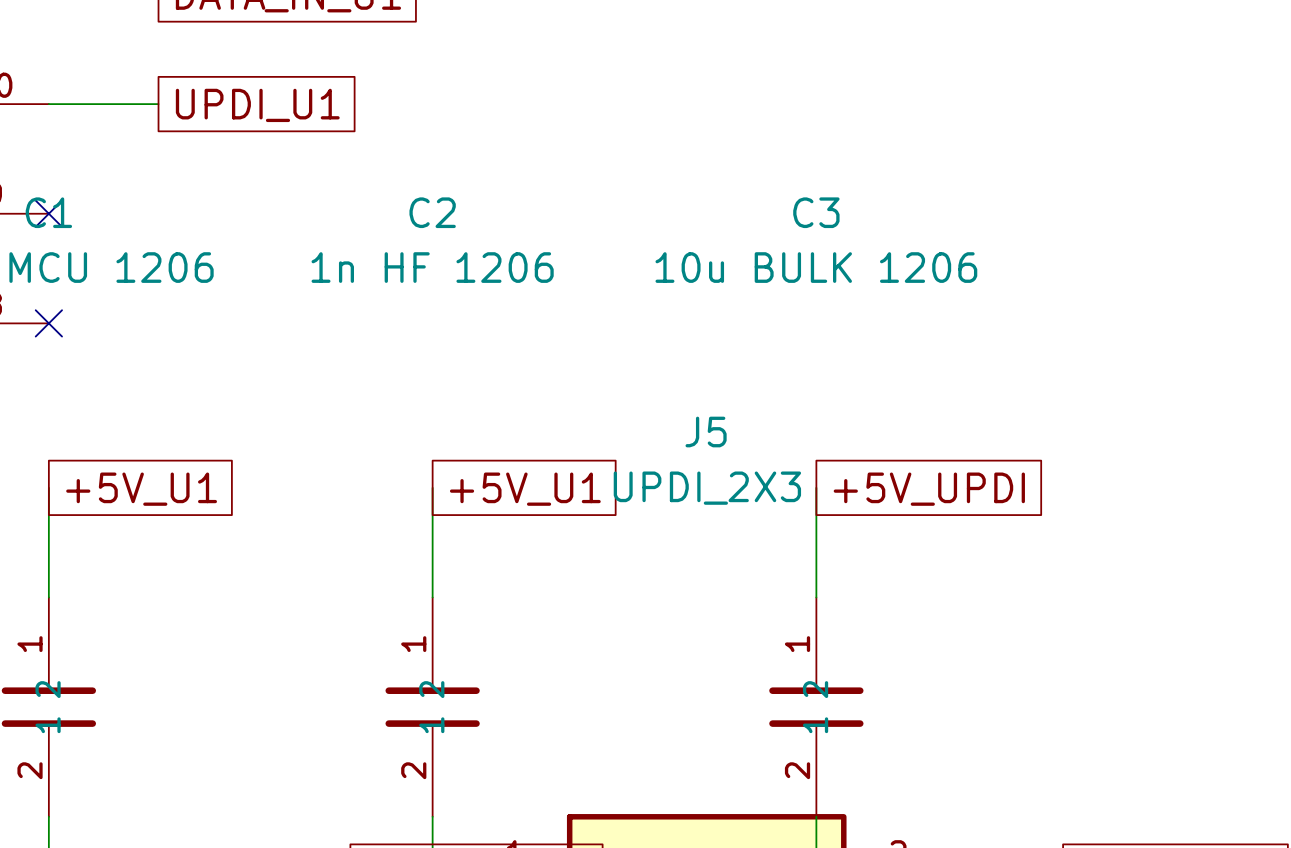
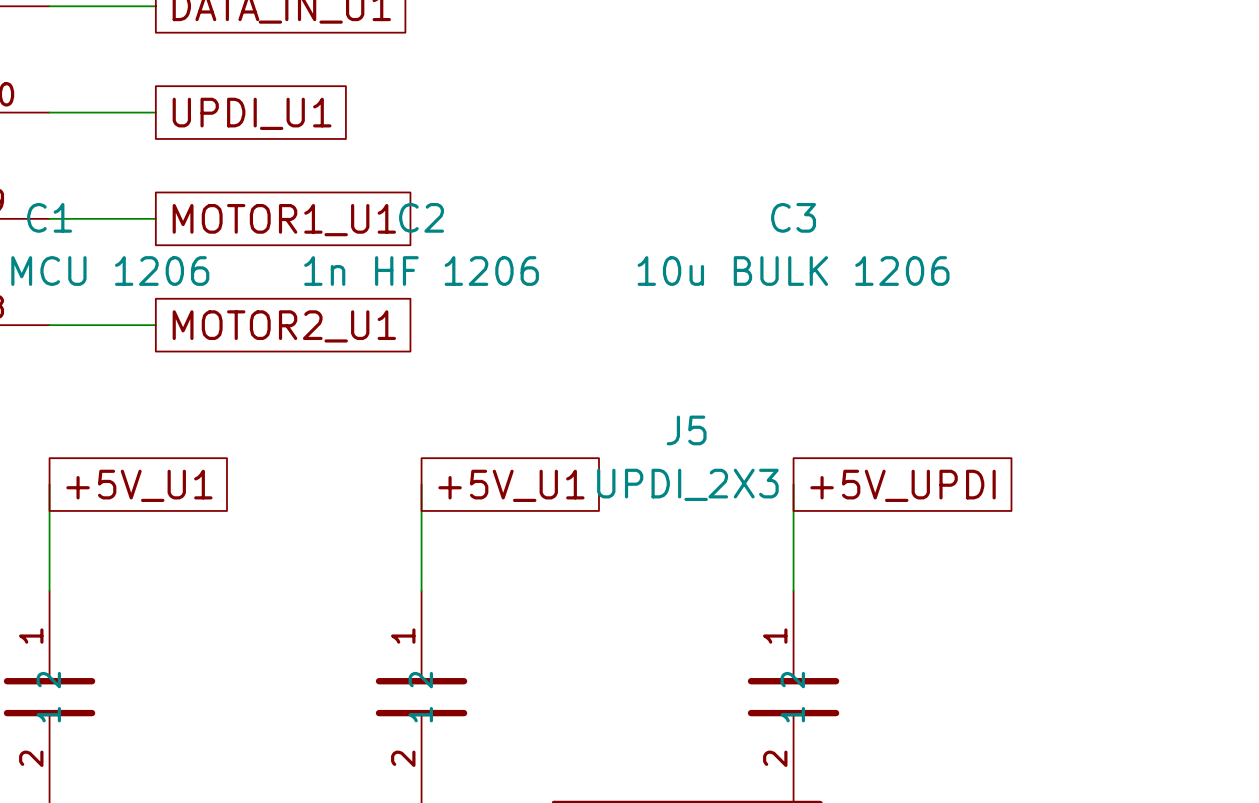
wire: none -> (49, 218) (155, 218)
no-connect mark: (48, 213) -> none
global label: none -> MOTOR1_U1 (284, 220)
wire: none -> (49, 325) (155, 325)
no-connect mark: (48, 323) -> none
global label: none -> MOTOR2_U1 (284, 326)

